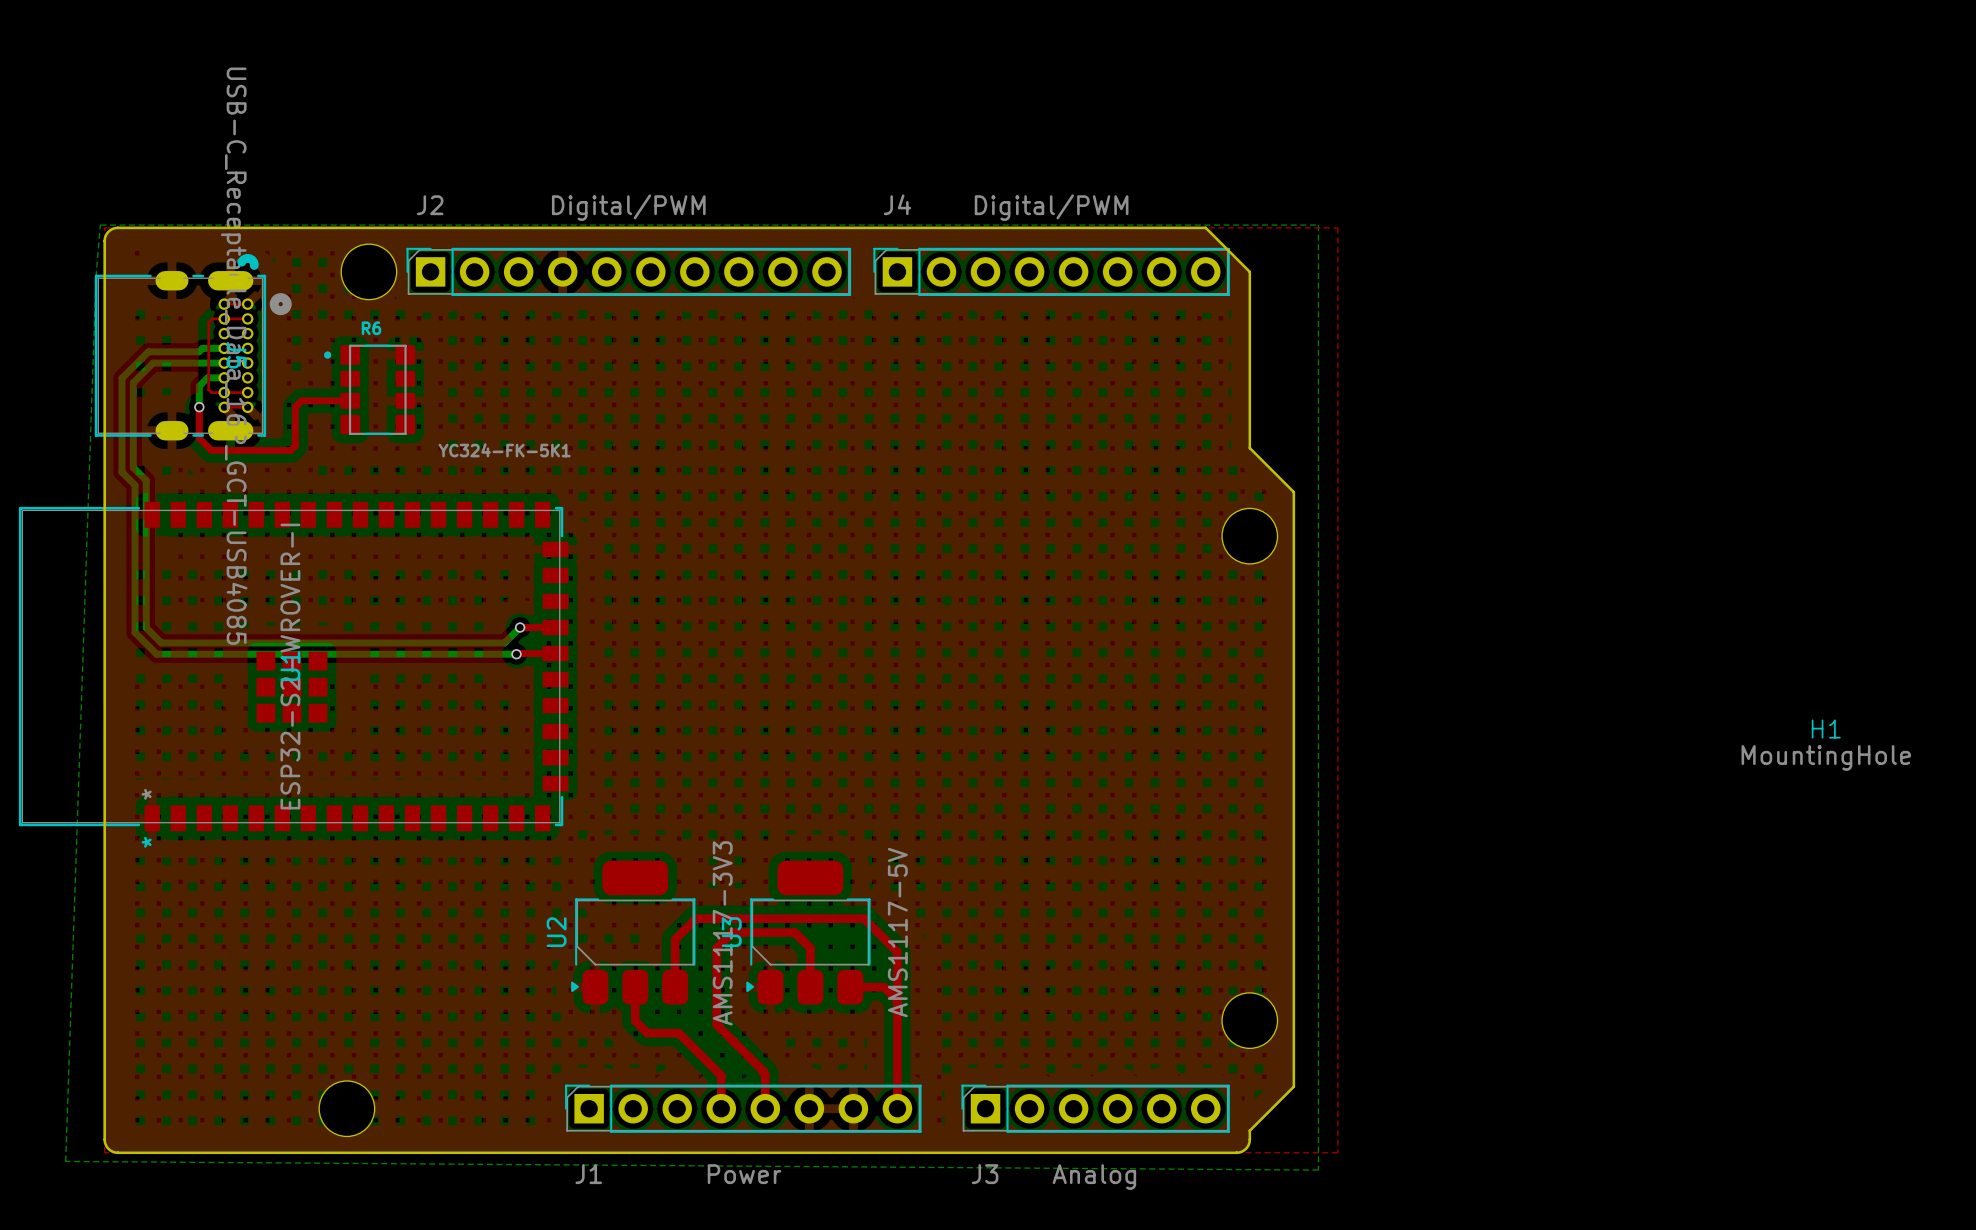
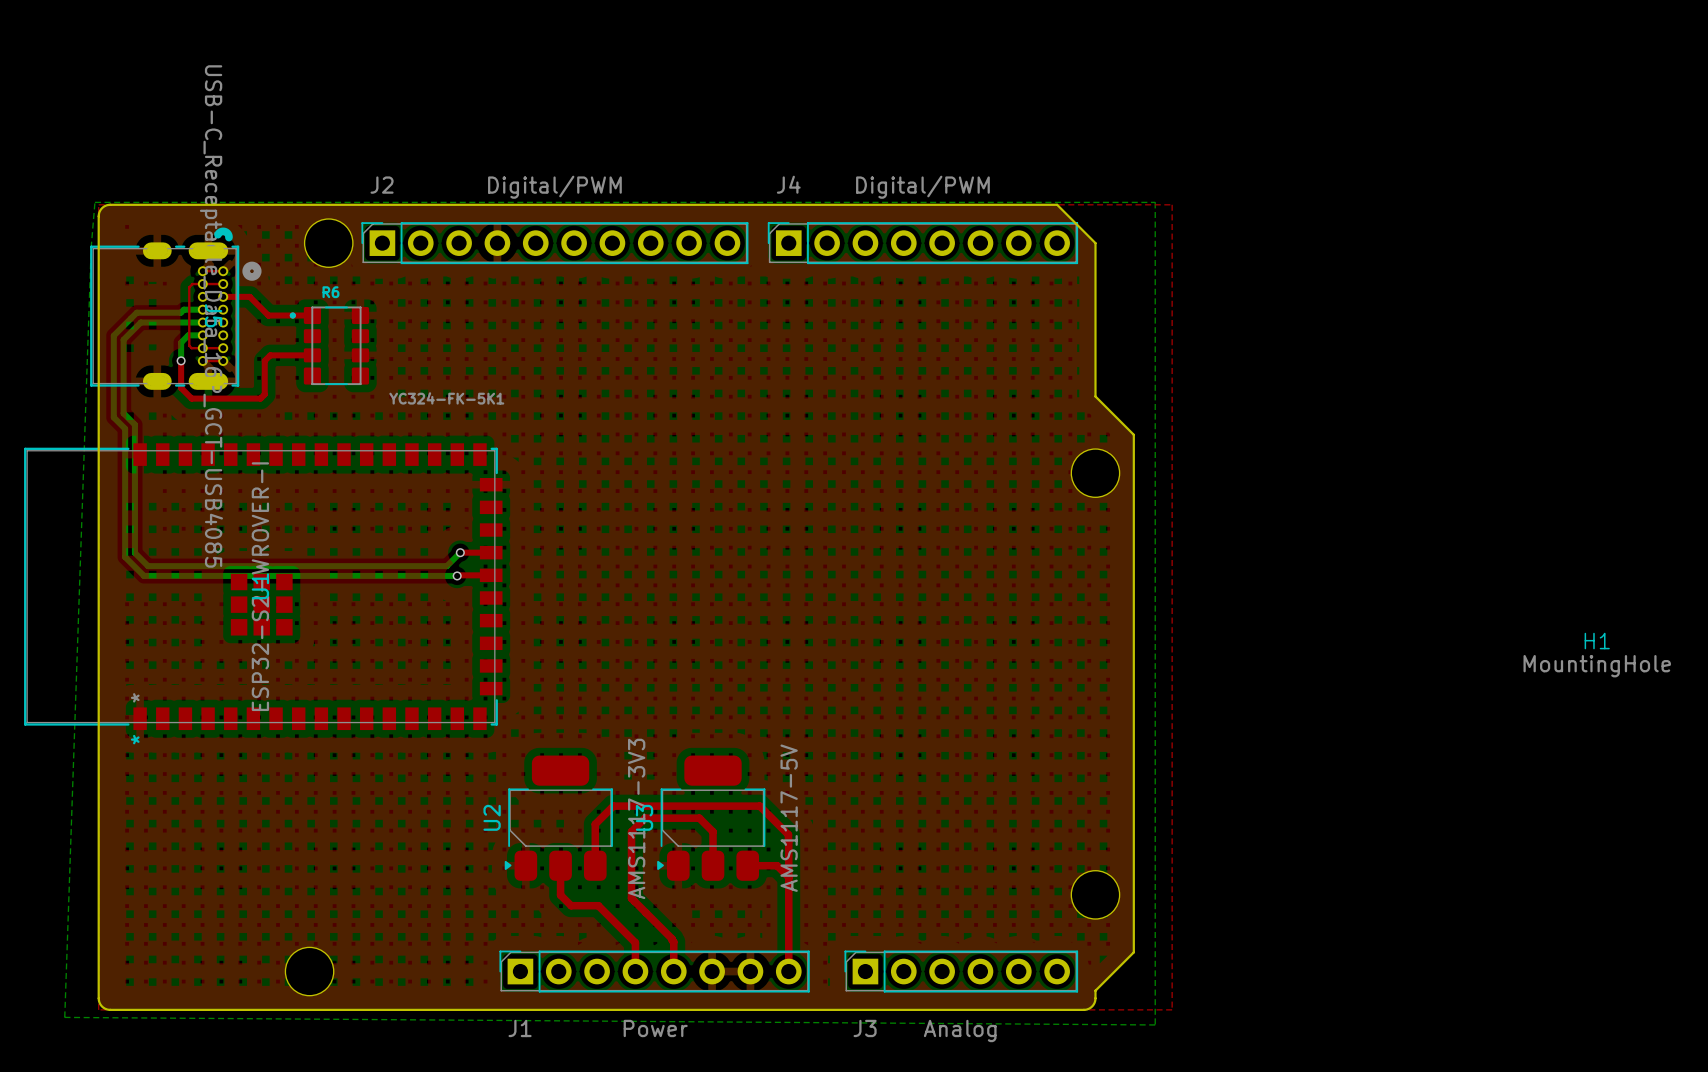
top track: none -> (223, 296) (249, 296) (268, 315)
top track: none -> (268, 315) (312, 315)

